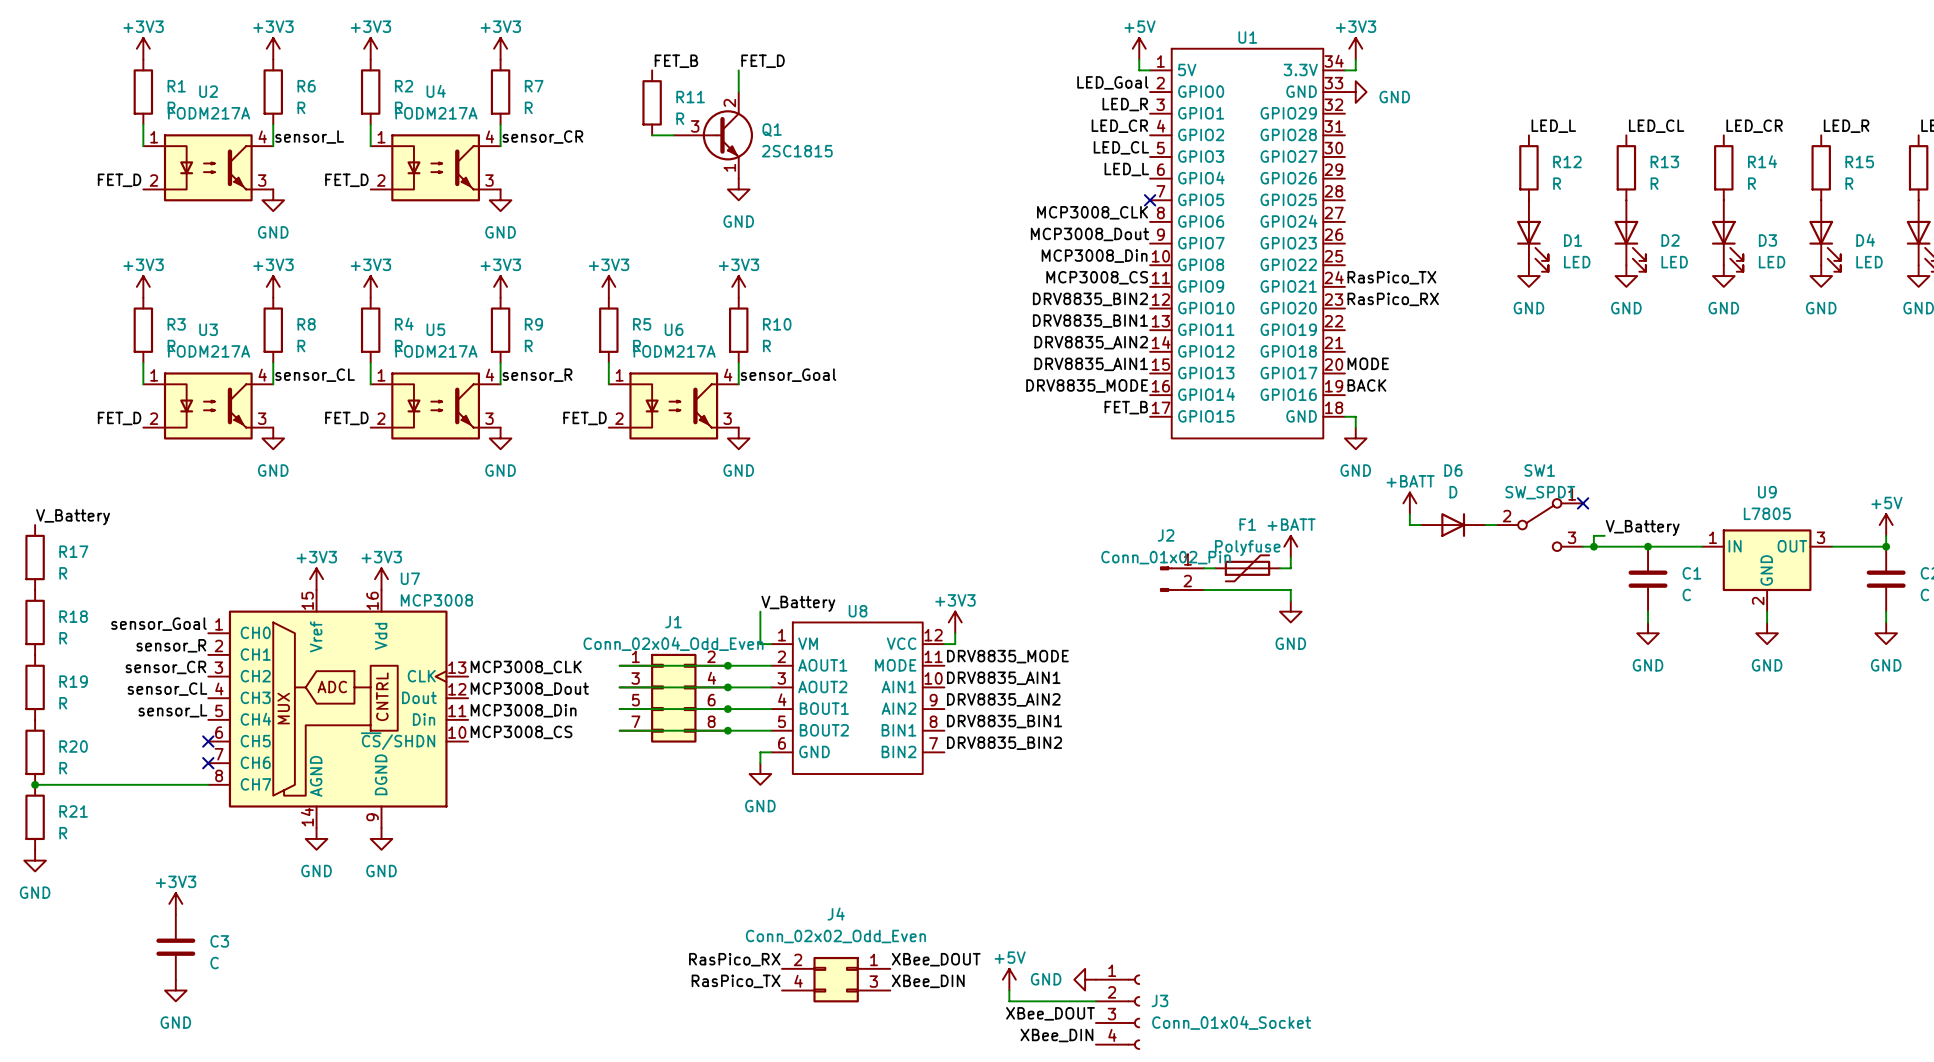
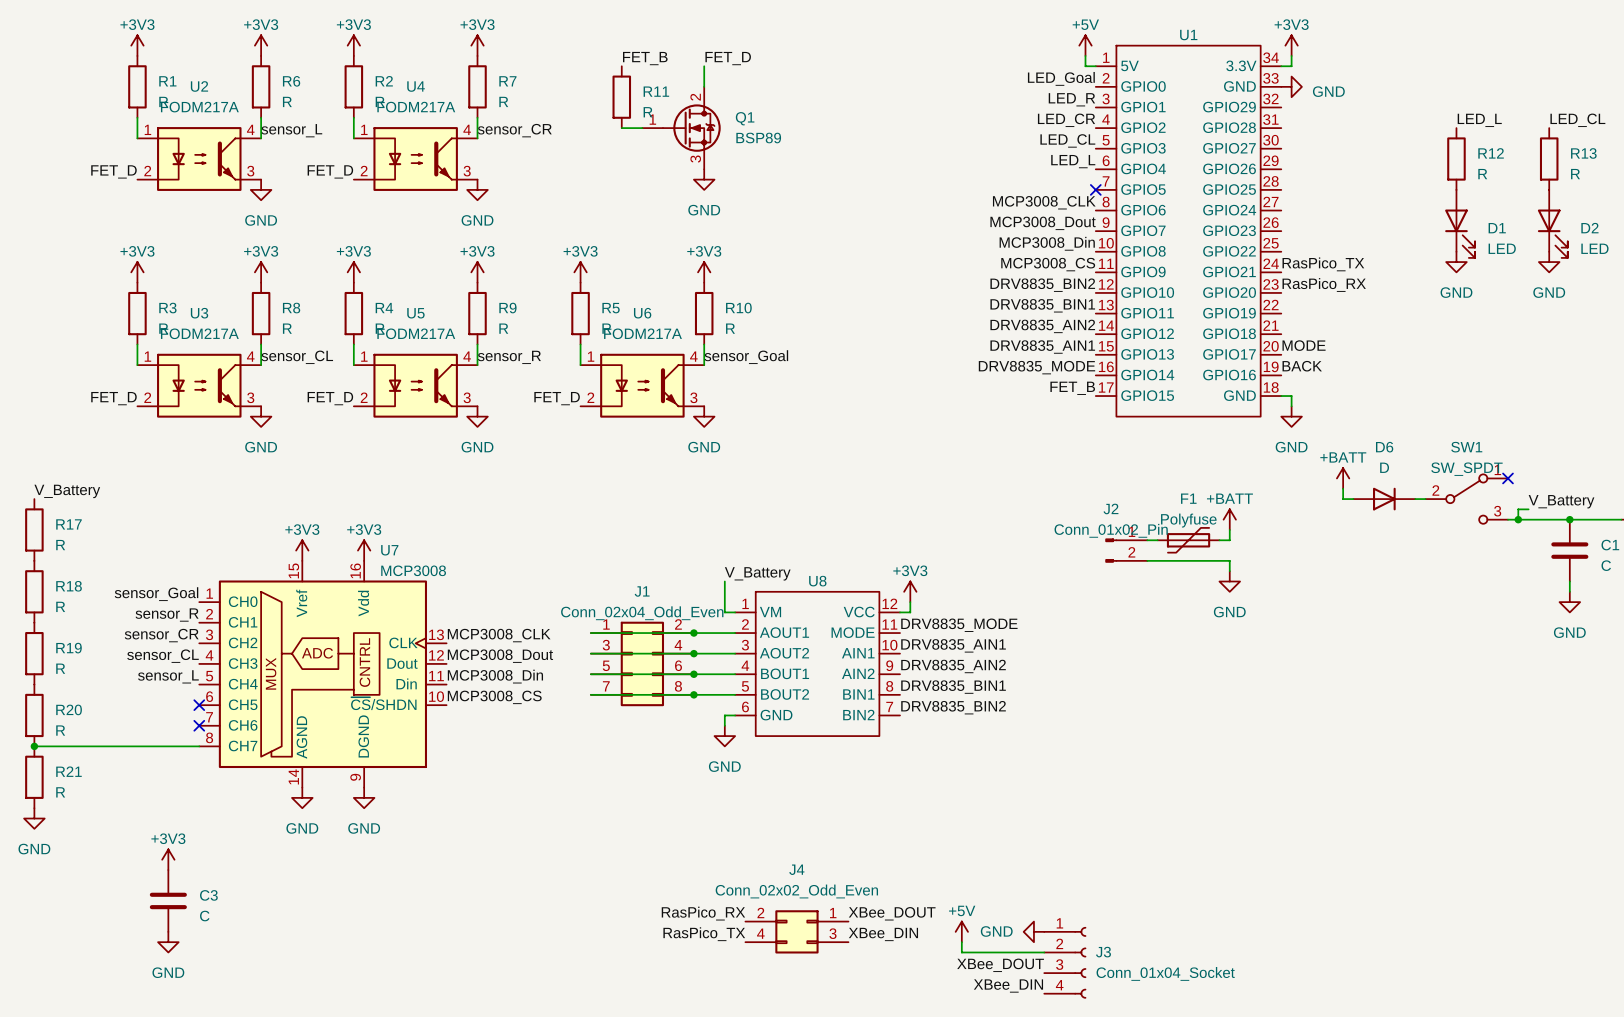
Q1 symbol: [673, 92, 754, 179] -> [642, 86, 721, 170]
Q1 value: 2SC1815 (797, 151) -> BSP89 (758, 138)

